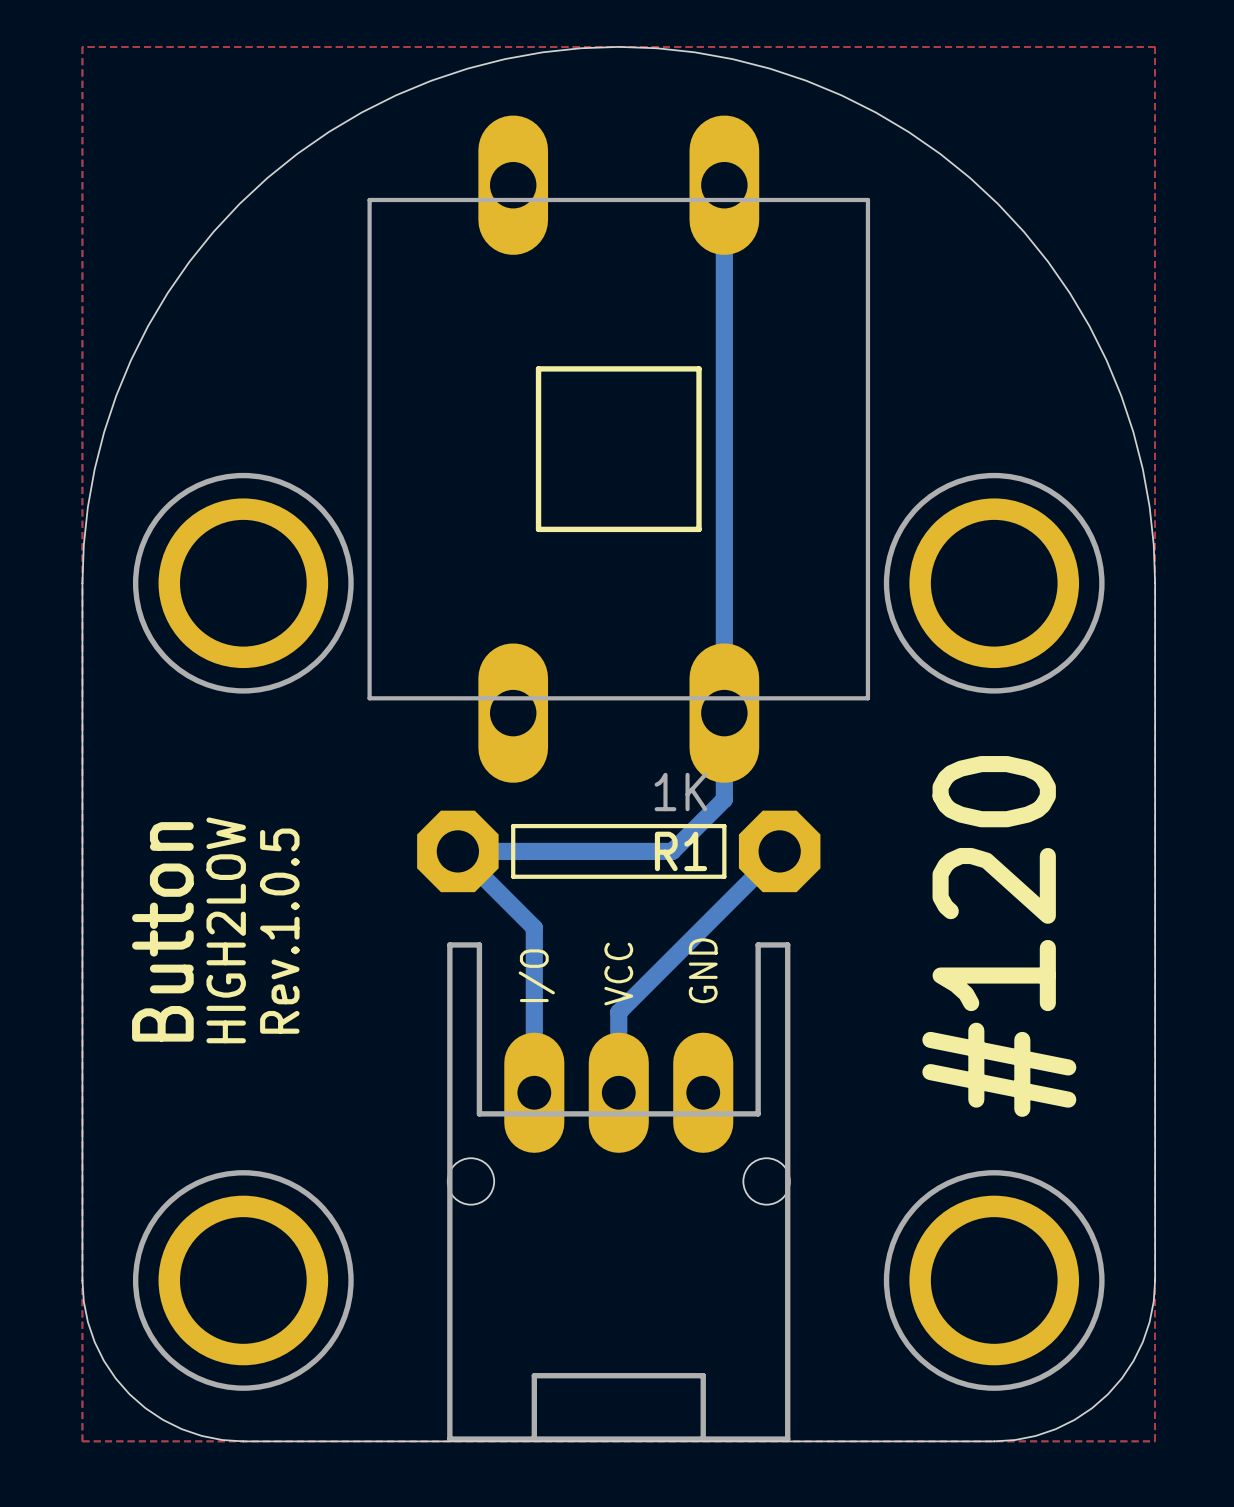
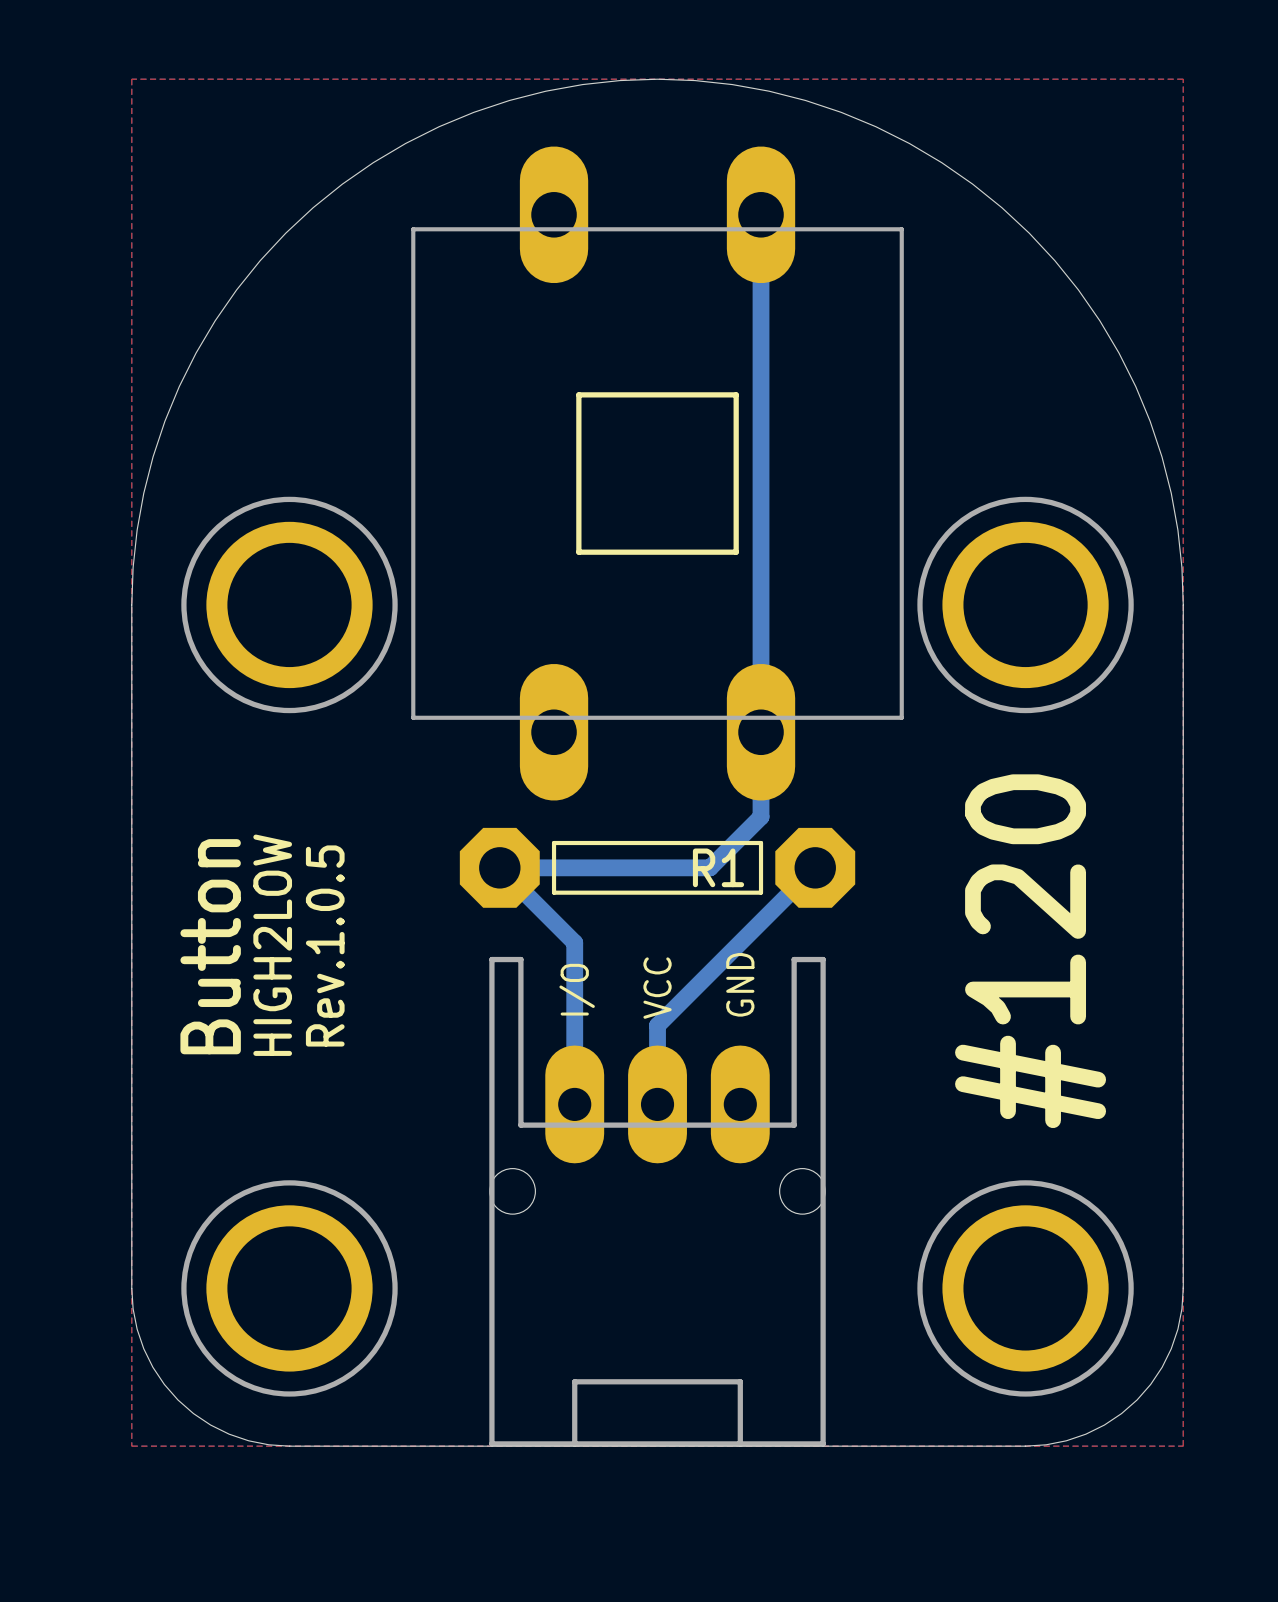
R1 value: 1K (680, 792) -> none

